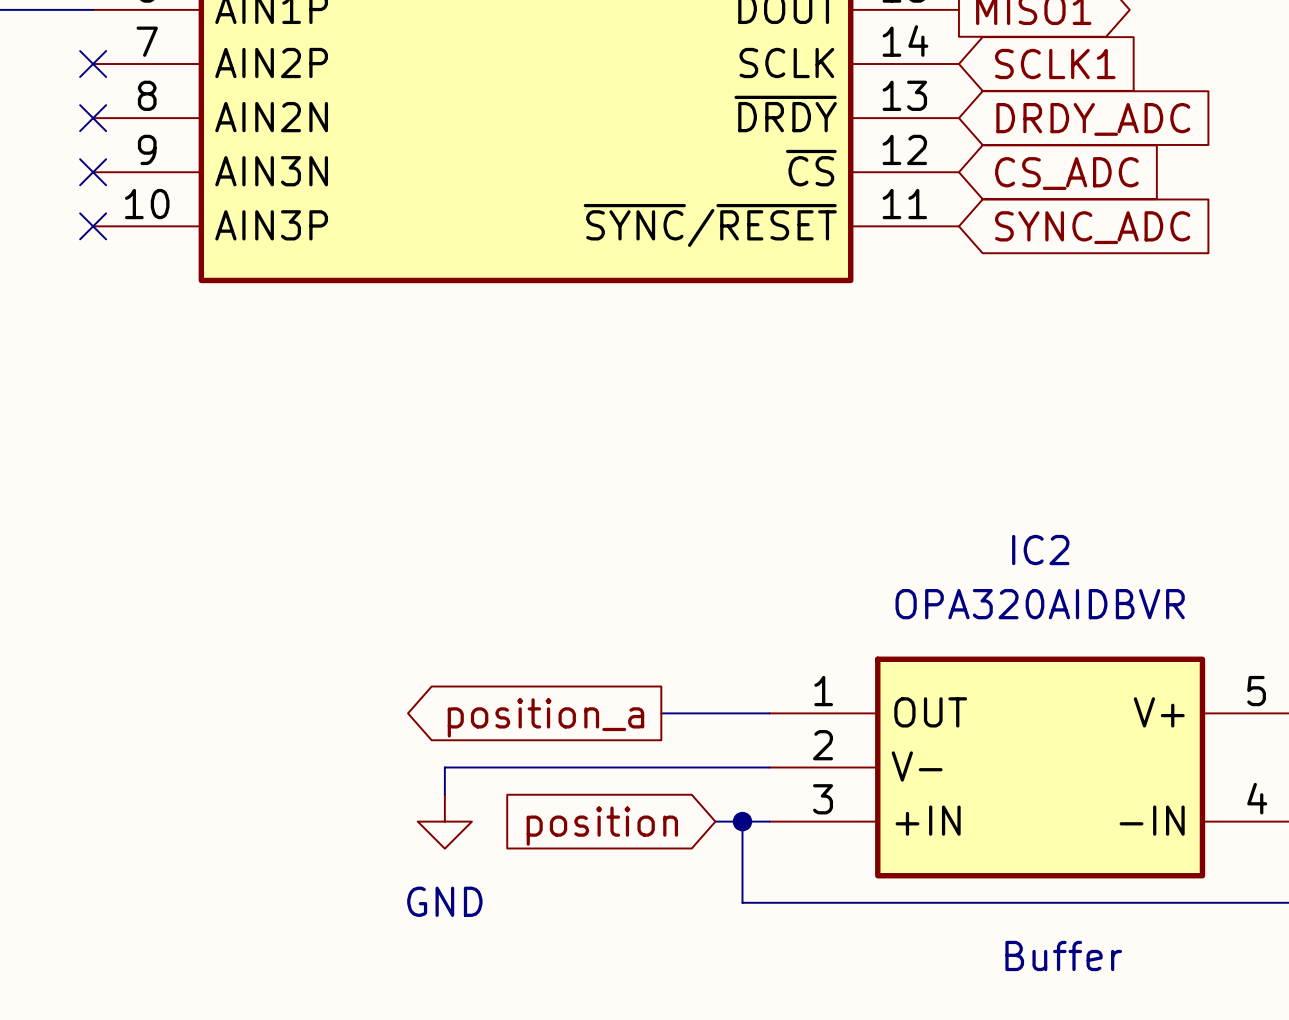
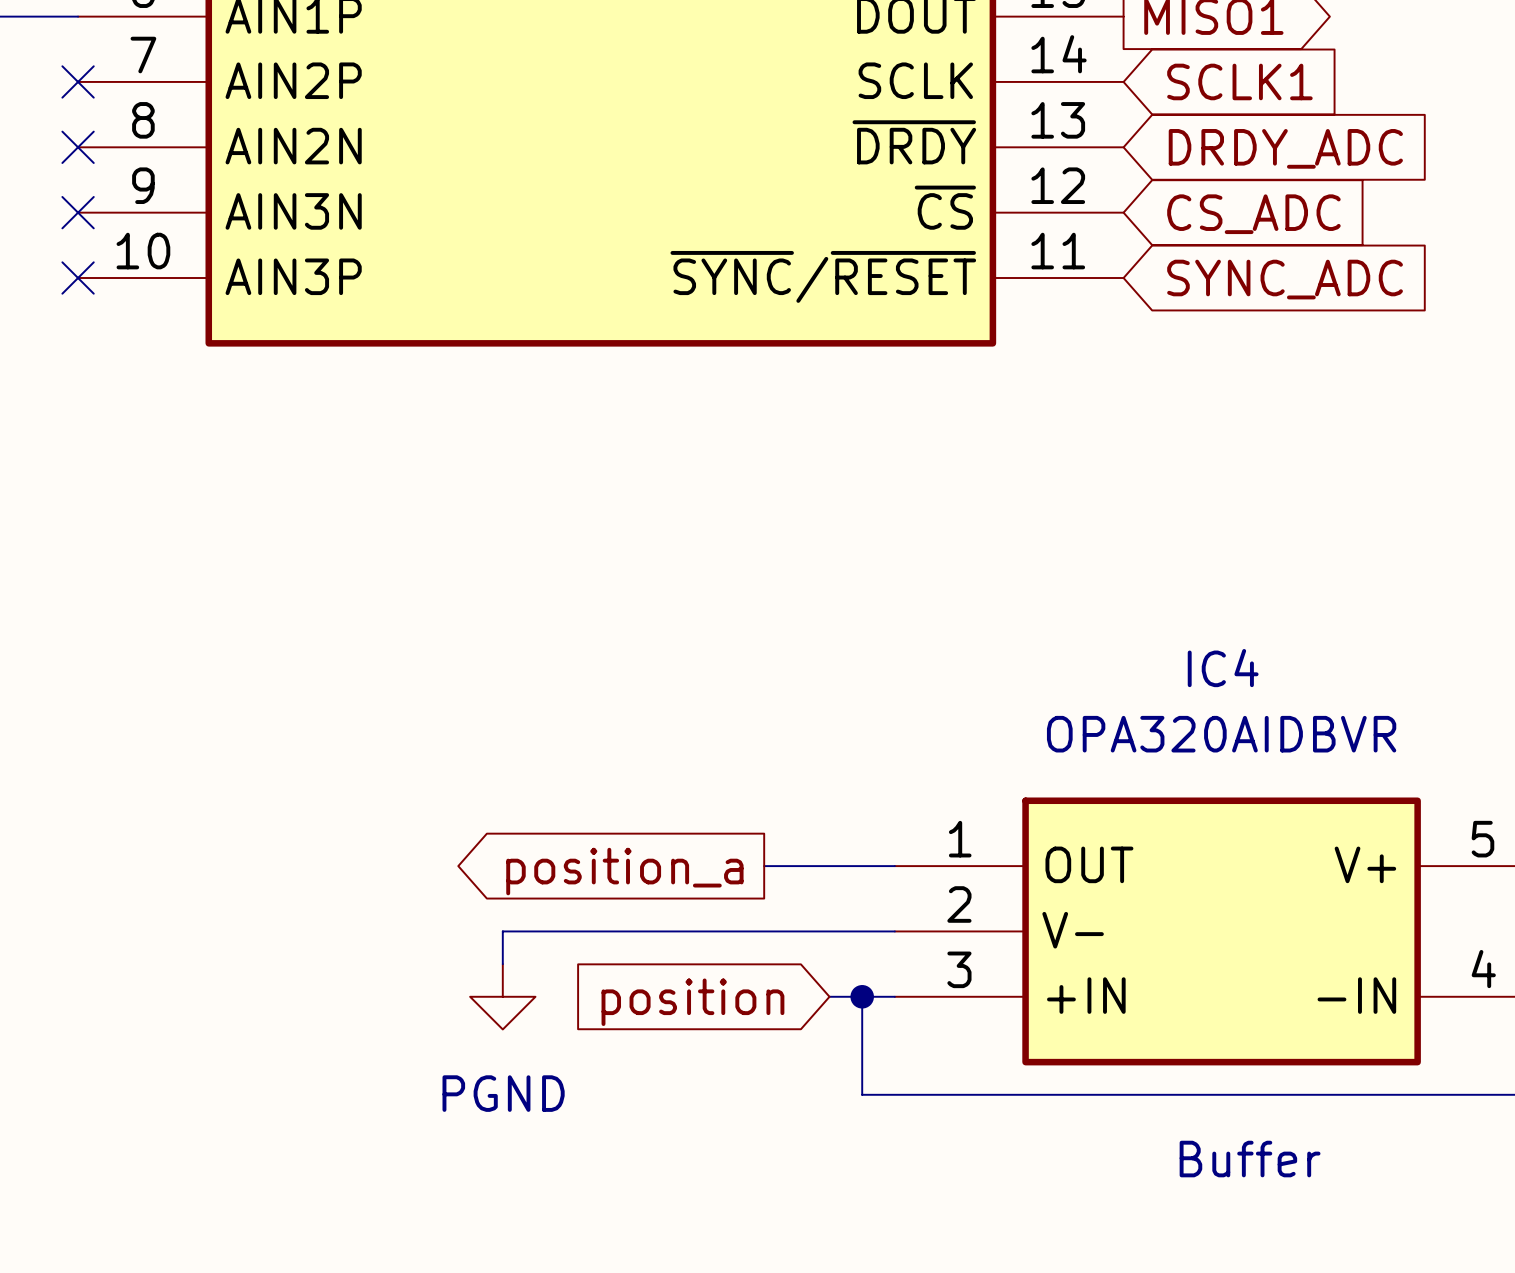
IC2 name: IC2 (1040, 550) -> IC4 (1223, 668)
power symbol: GND (444, 821) -> PGND (502, 996)

